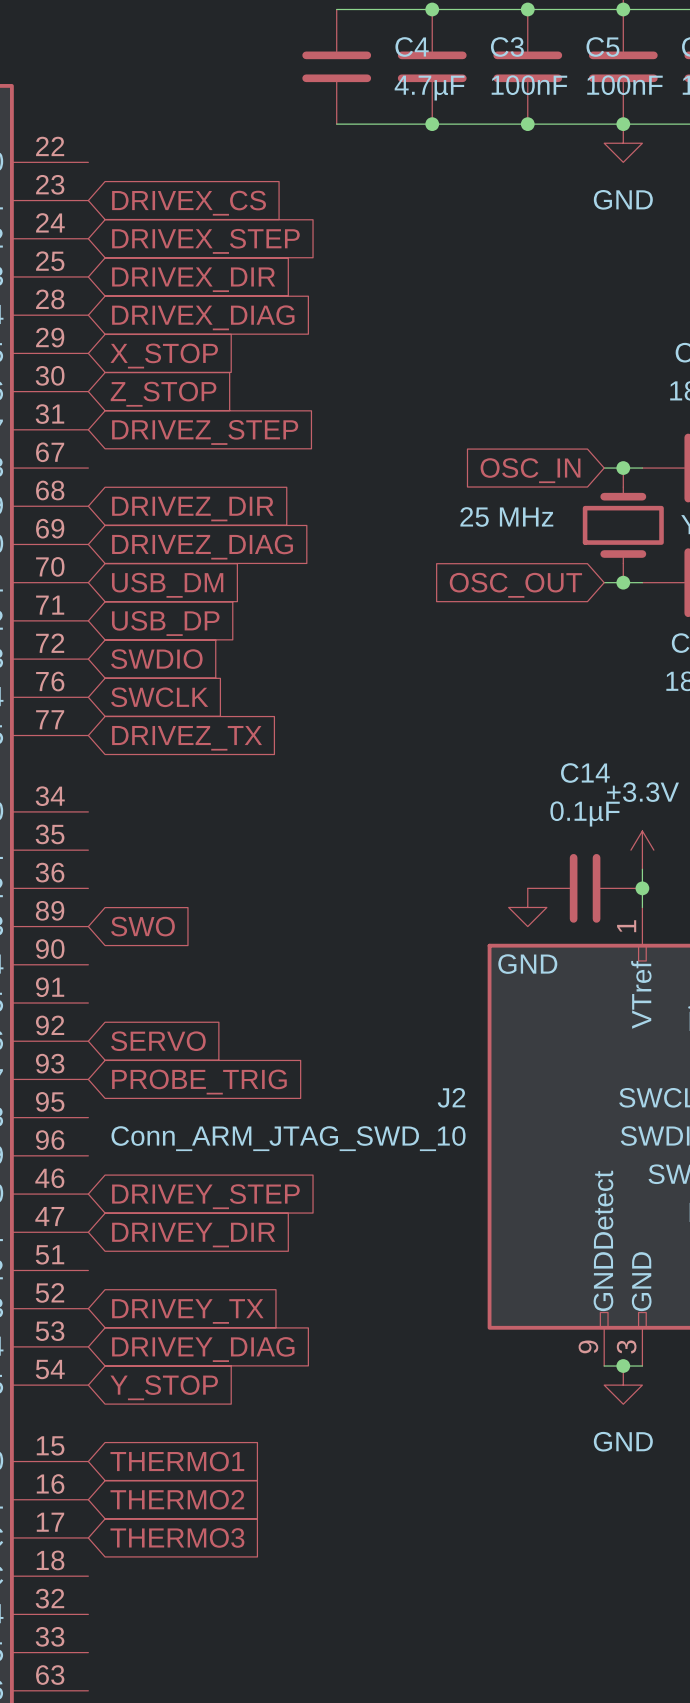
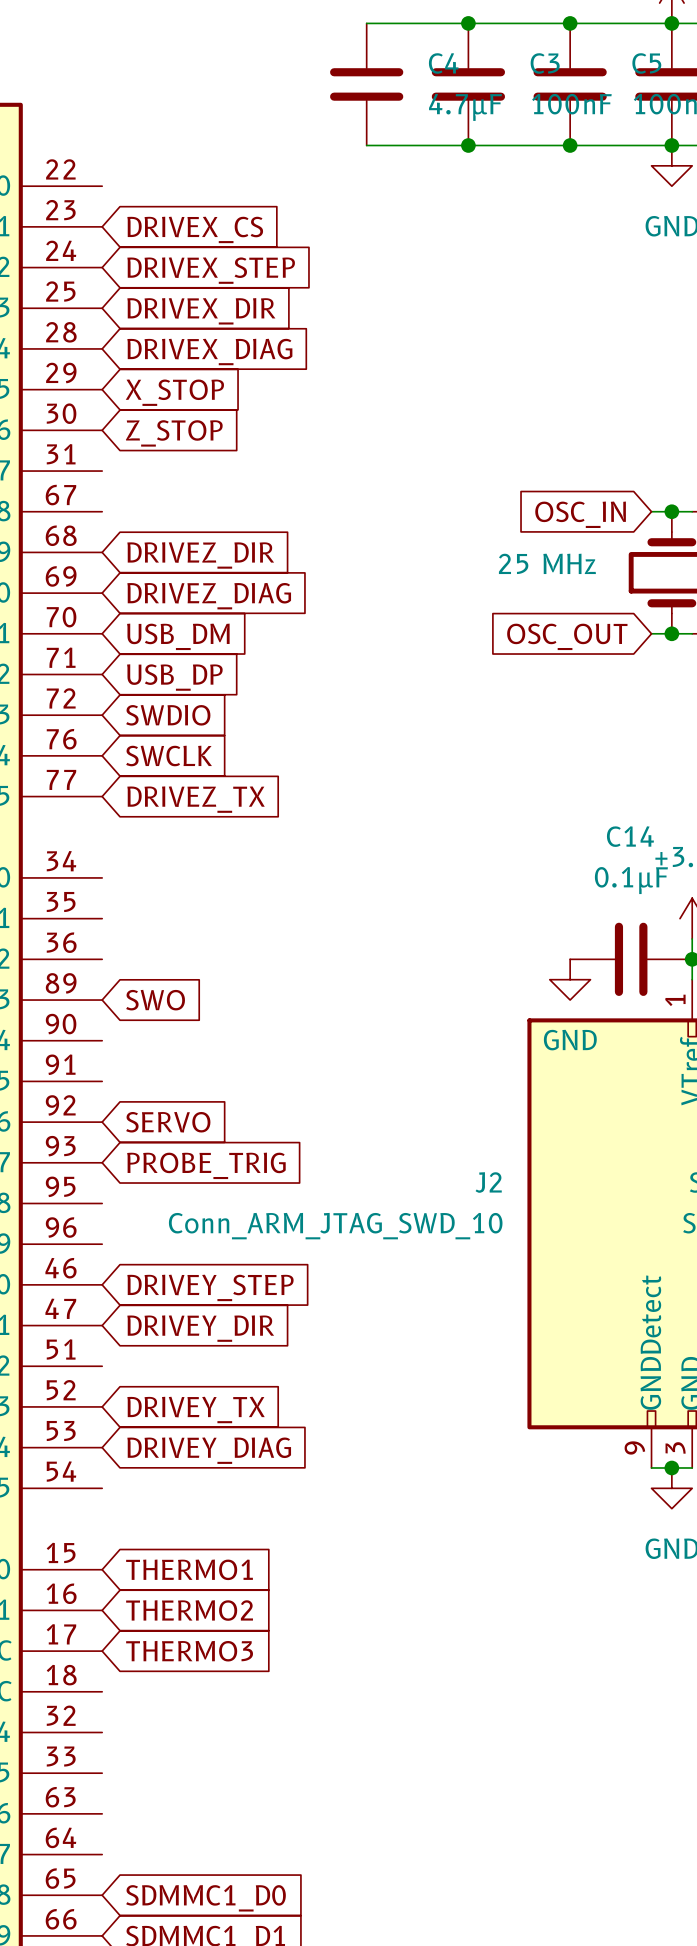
global label: DRIVEZ_STEP (205, 432) -> none
global label: Y_STOP (164, 1387) -> none

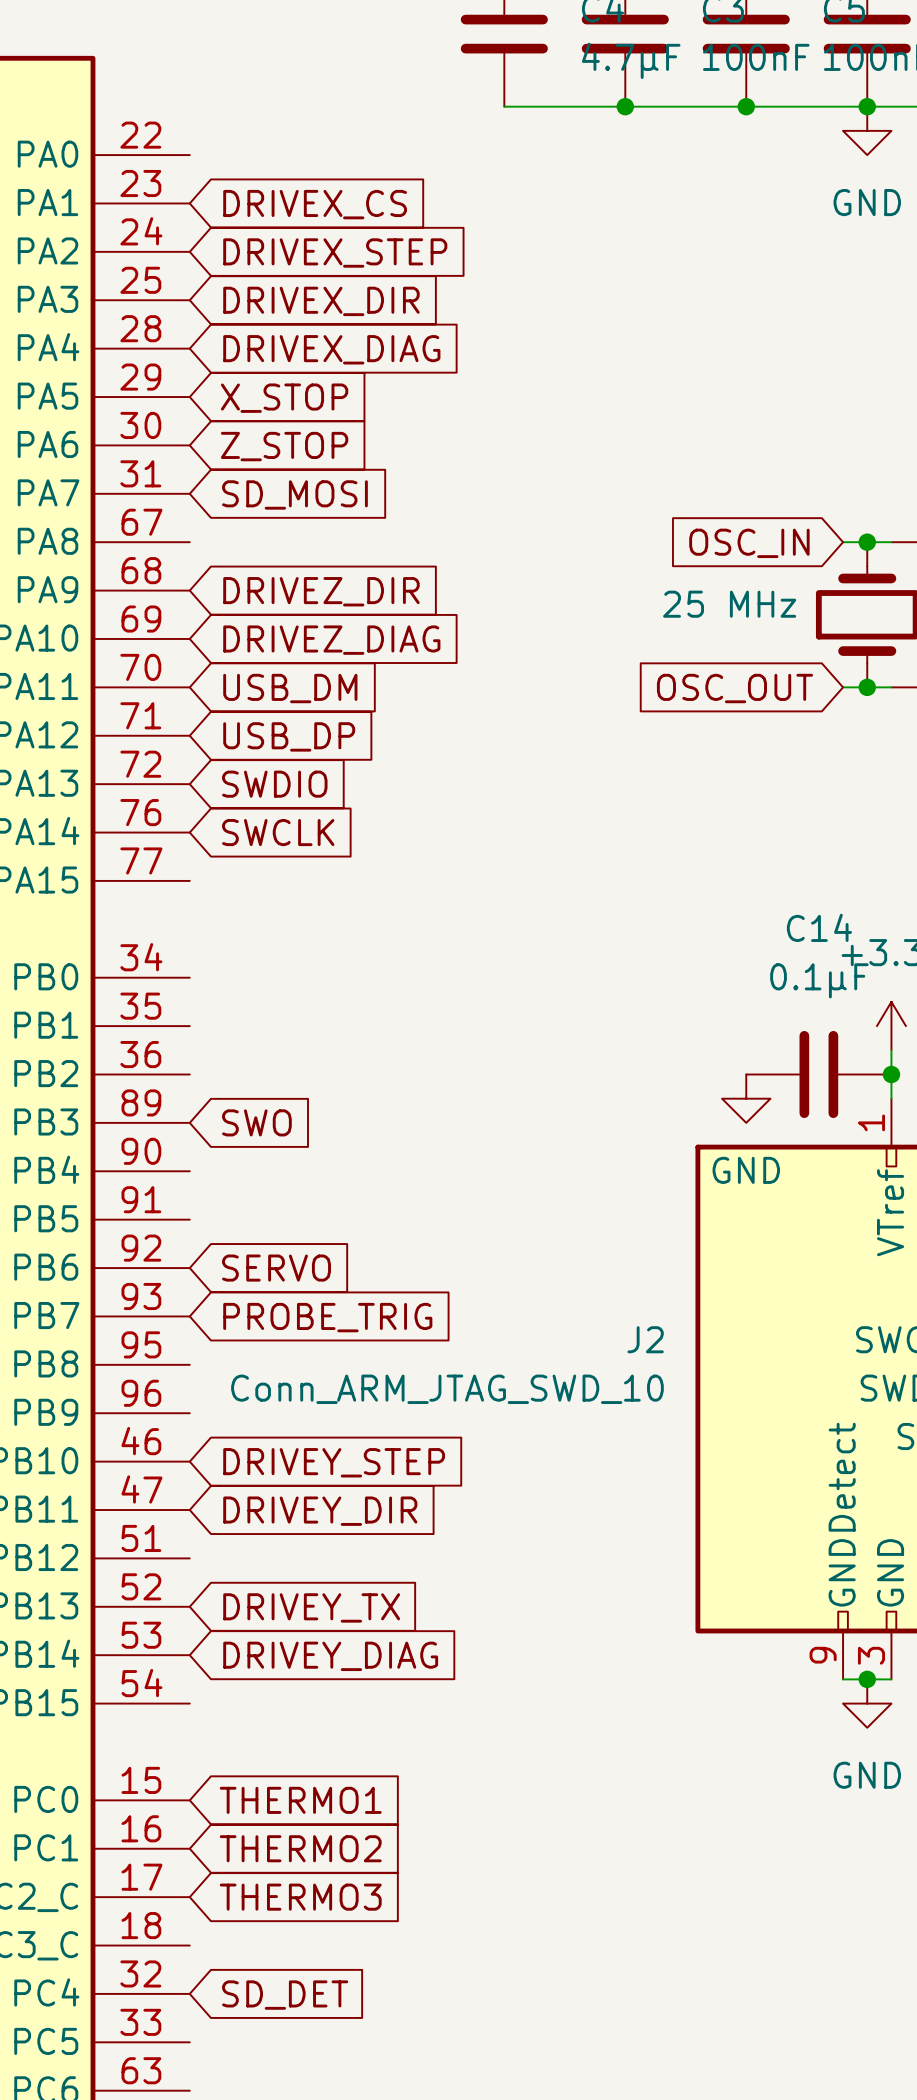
global label: none -> SD_MOSI (294, 494)
global label: DRIVEZ_TX (196, 799) -> none
global label: none -> SD_DET (285, 1995)

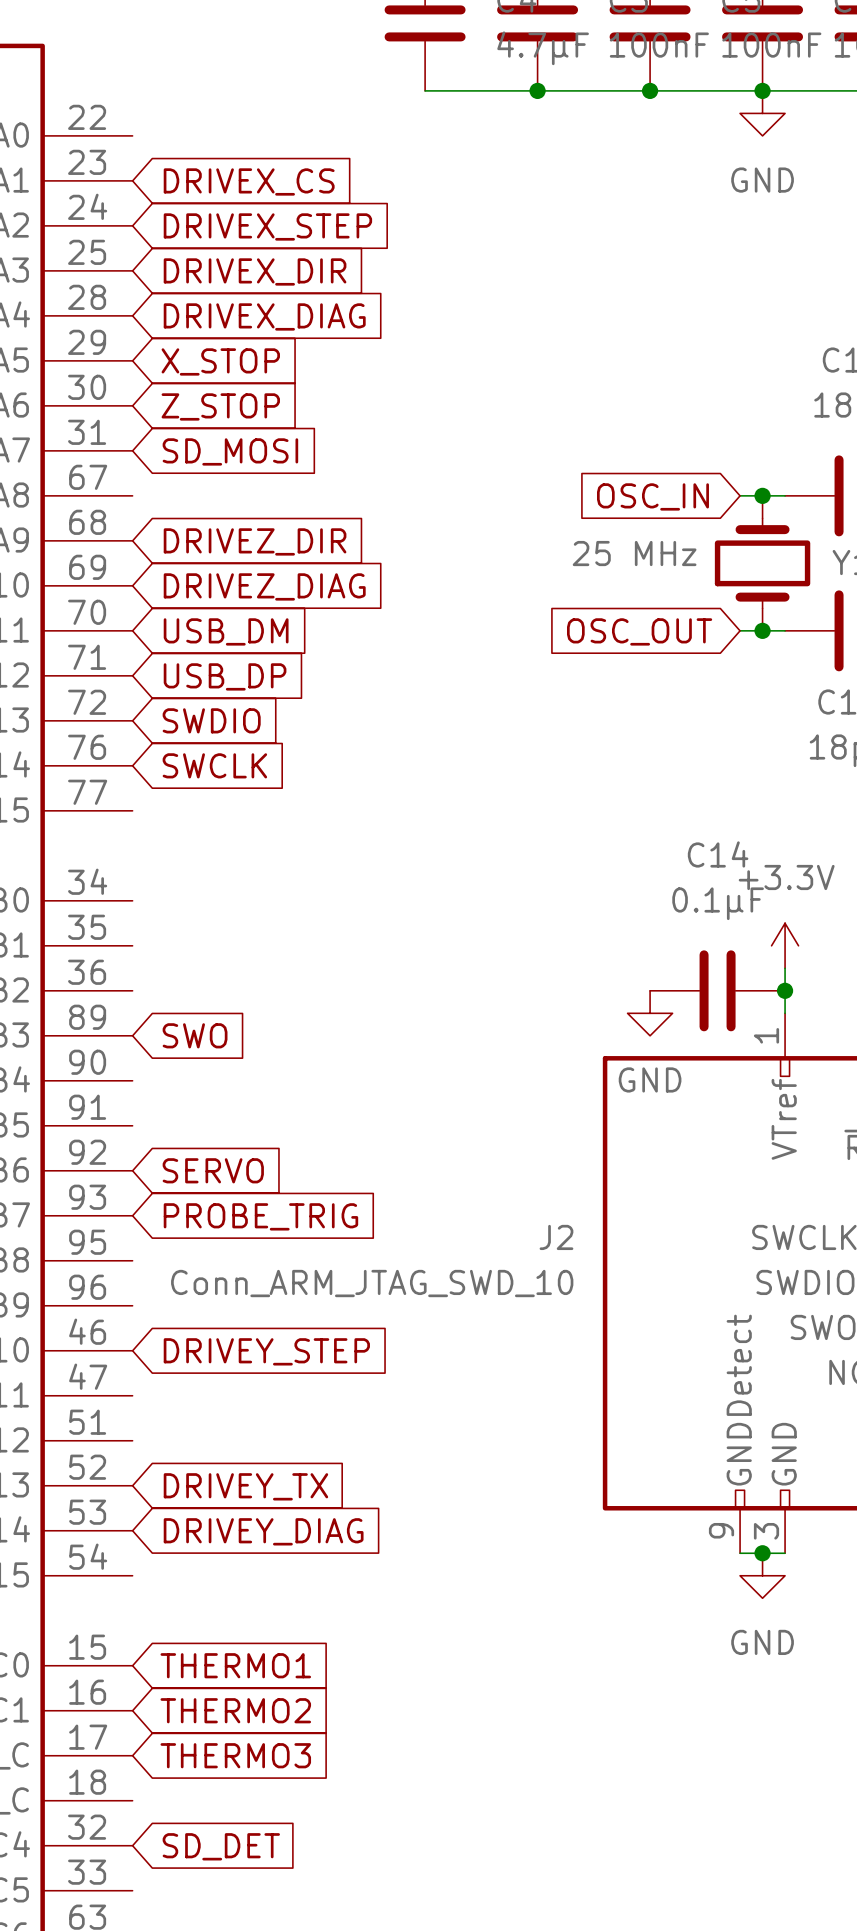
global label: DRIVEY_DIR (320, 1511) -> none

